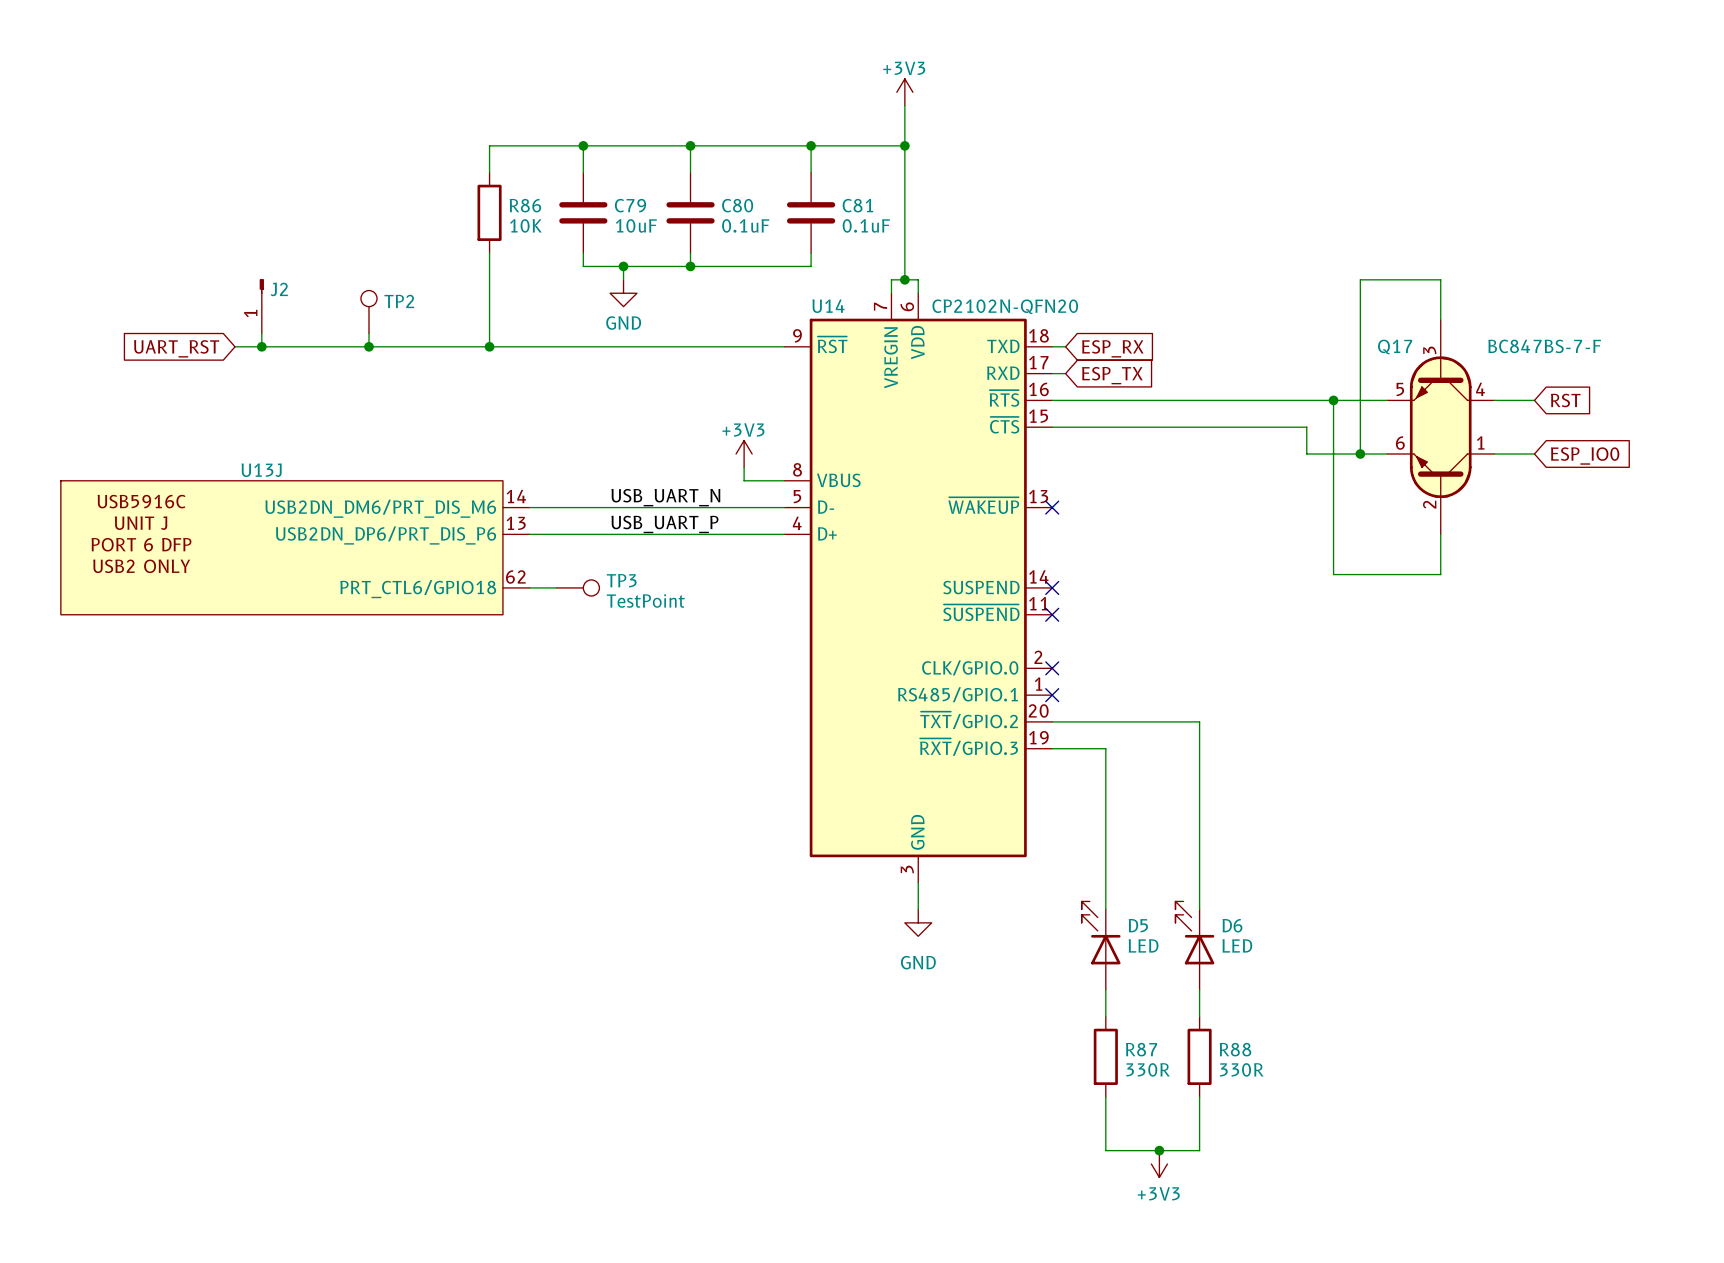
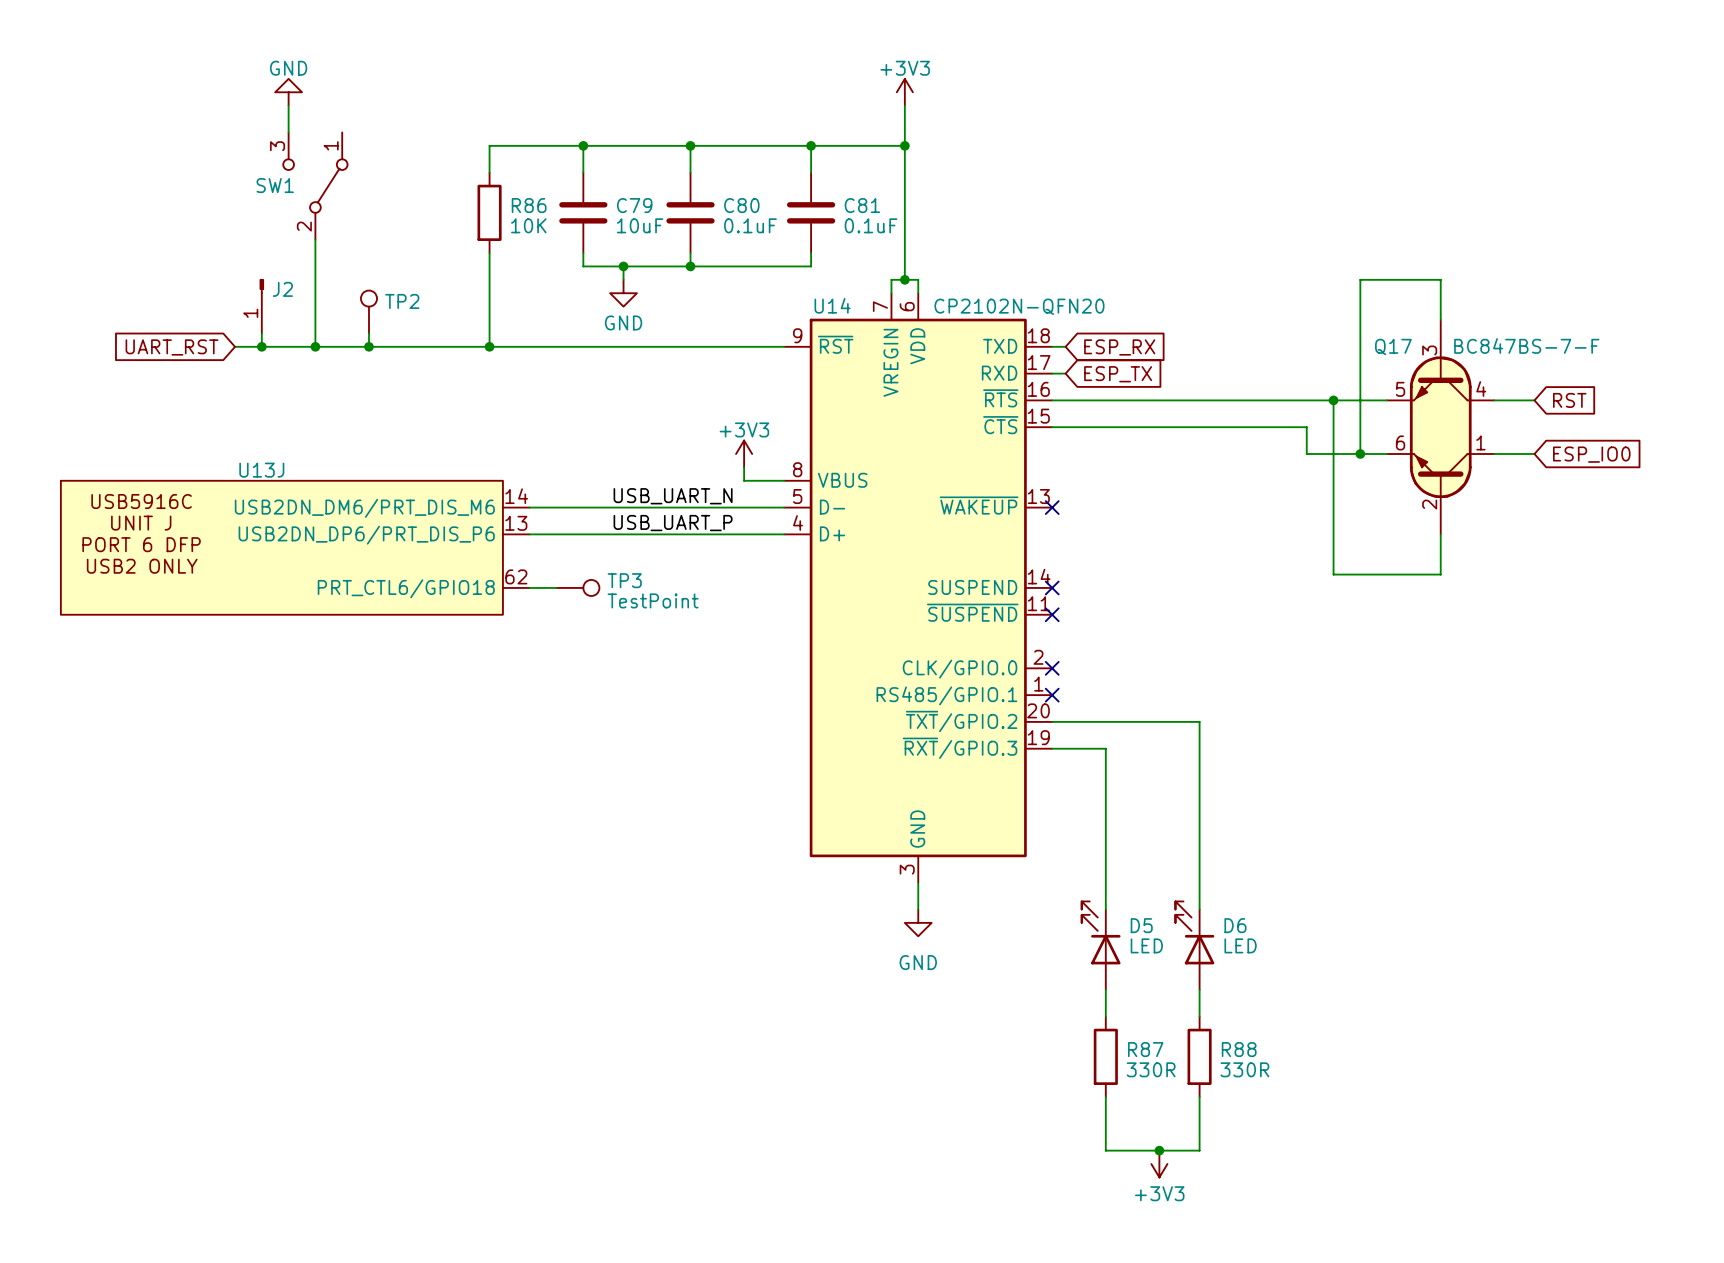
power symbol: none -> GND (288, 92)
wire: none -> (288, 105) (288, 132)
SW1: none -> (315, 186)
wire: none -> (315, 239) (315, 346)
junction: none -> (315, 346)

